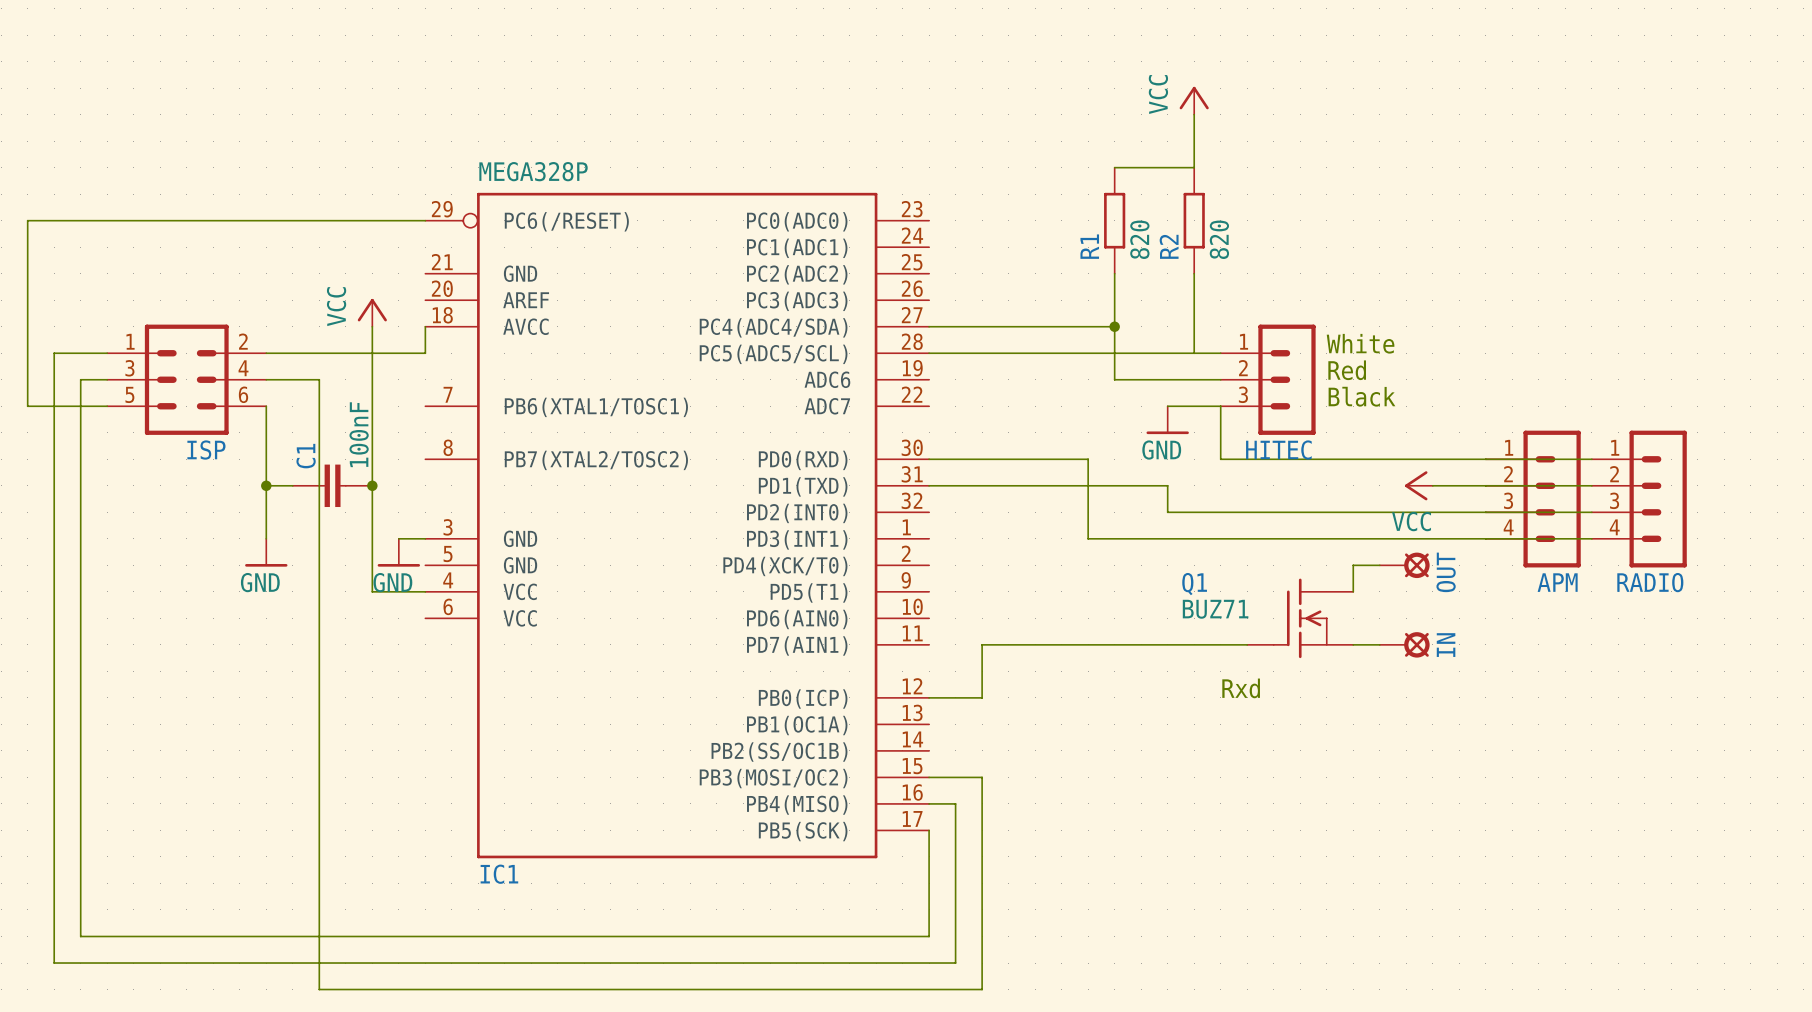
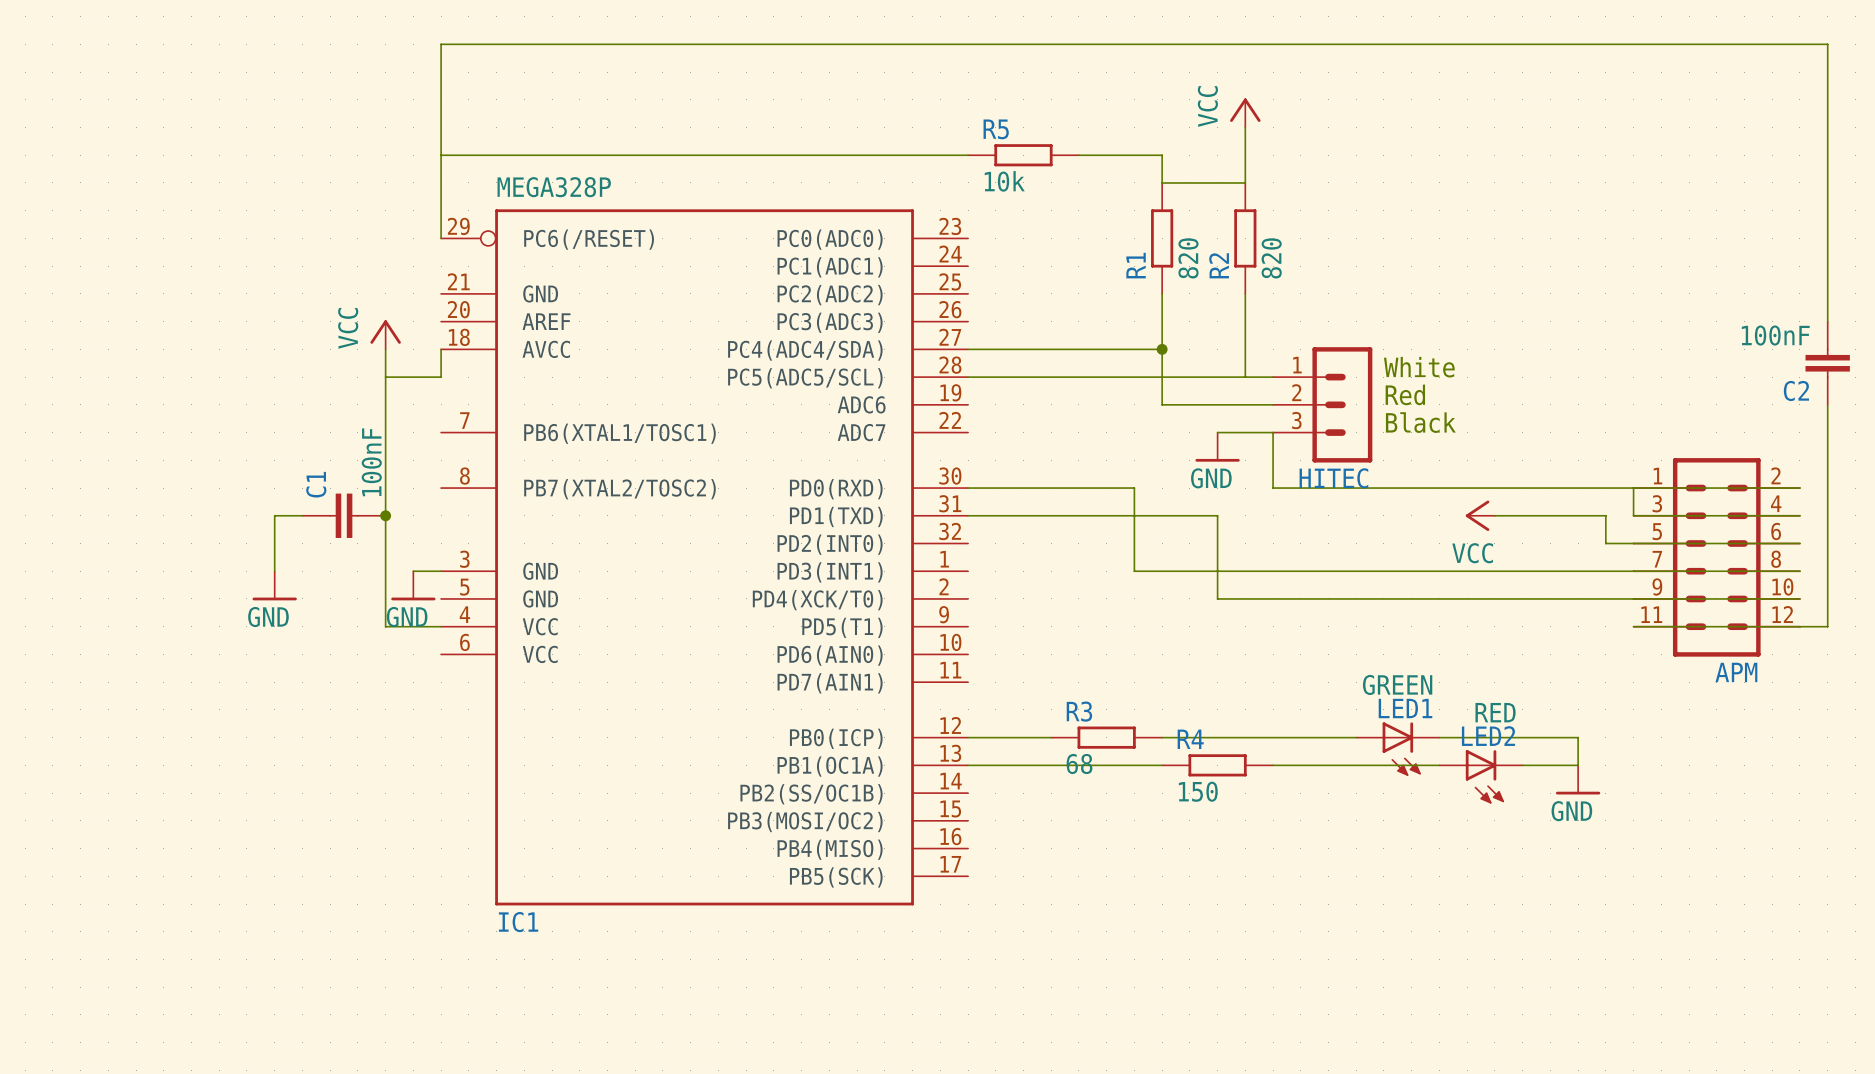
wire: none -> (441, 155) (968, 155)
R5: none -> 10k (1023, 155)
wire: none -> (1078, 155) (1162, 155) (1162, 182)
wire: (425, 220) (27, 220) (27, 406) (107, 406) -> (441, 238) (441, 44) (1827, 44) (1827, 321)
C2: none -> 100nF (1827, 363)
wire: (107, 353) (54, 353) (54, 963) (955, 963) (955, 803) (929, 803) -> none
wire: (266, 353) (372, 353) -> none
wire: (107, 379) (80, 379) (80, 936) (929, 936) (929, 830) -> none
ISP: (186, 379) -> none
wire: (266, 379) (319, 379) (319, 989) (982, 989) (982, 777) (929, 777) -> none
wire: none -> (1827, 404) (1827, 626) (1633, 626)
wire: (266, 406) (266, 485) -> none
junction: (266, 485) -> none
wire: (1538, 485) (1565, 485) -> (1633, 488) (1633, 515)
APM: (1533, 499) -> none
RADIO: (1639, 499) -> none
wire: (1167, 512) (1538, 512) -> (1217, 543) (1217, 598) (1411, 598)
APM: none -> (1716, 557)
wire: (1353, 565) (1353, 591) -> (1605, 515) (1605, 543)
wire: none -> (1439, 598) (1799, 598)
OUT: (1404, 565) -> none
Q1: BUZ71 (1300, 618) -> none
wire: (1247, 644) (982, 644) (982, 697) -> (1051, 737) (1023, 737)
wire: (1353, 644) (1379, 644) -> none
IN: (1404, 644) -> none
text: Rxd (1241, 688) -> none
R3: none -> 68 (1106, 737)
wire: none -> (1162, 737) (1356, 737)
wire: none -> (1439, 737) (1578, 737) (1578, 765) (1522, 765)
LED1: none -> GREEN (1397, 749)
wire: none -> (968, 765) (1162, 765)
R4: none -> 150 (1217, 765)
wire: none -> (1273, 765) (1439, 765)
LED2: none -> RED (1481, 776)
power symbol: none -> GND (1578, 779)

